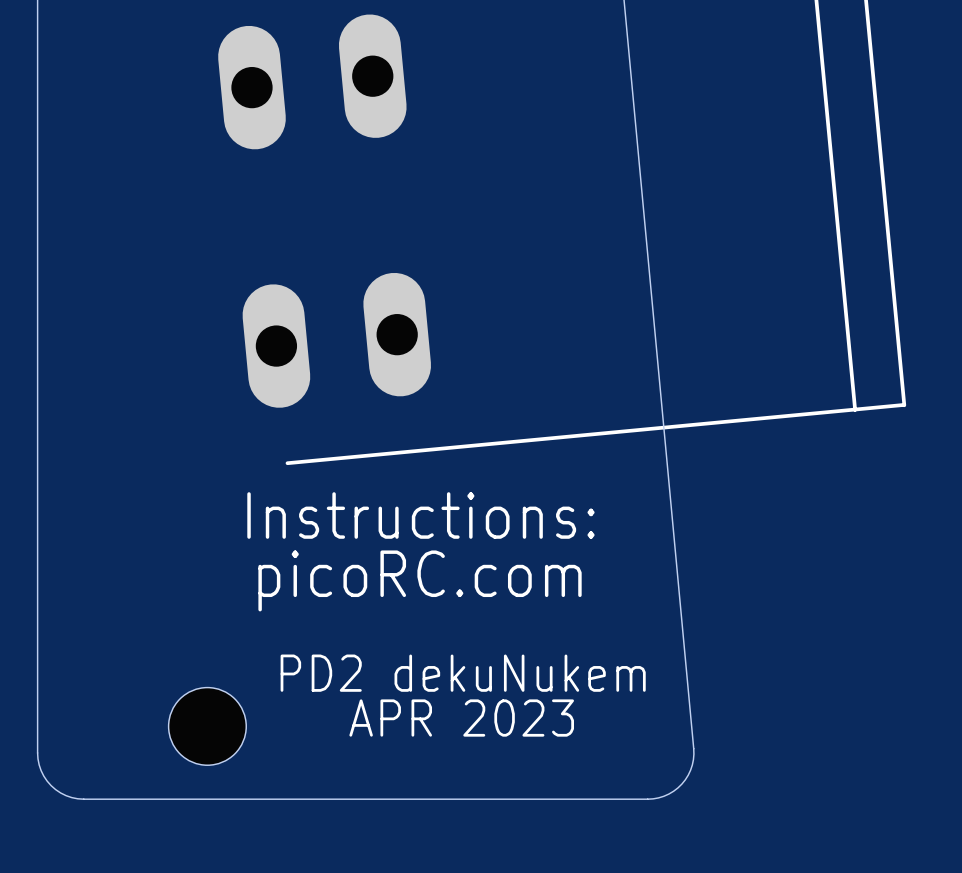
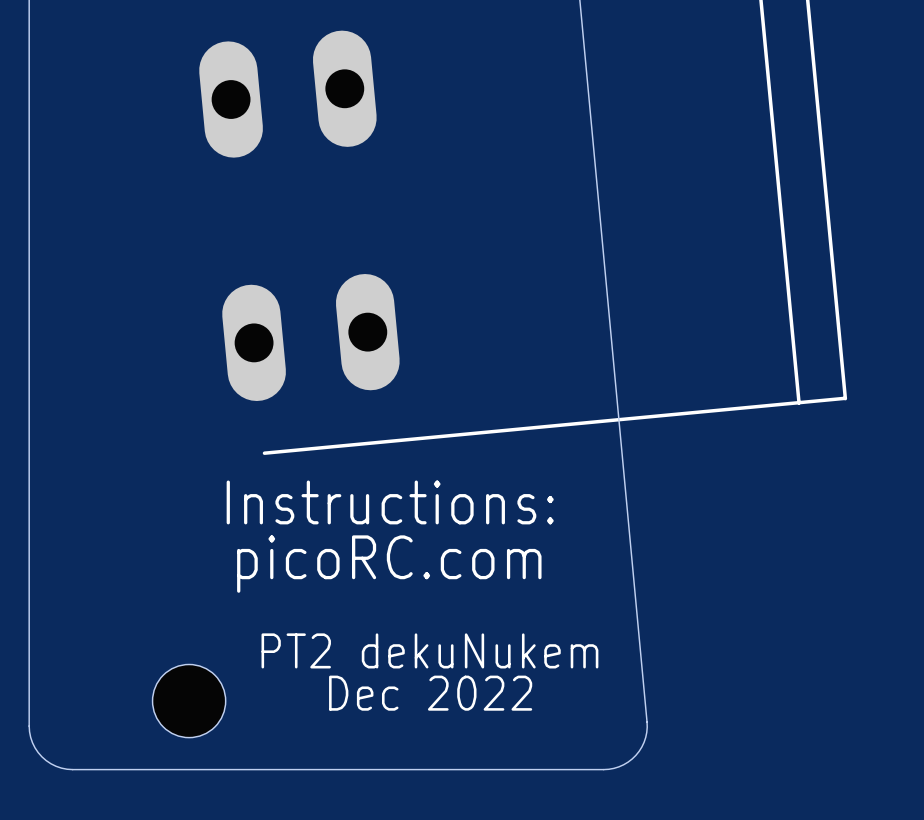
text: PD2 dekuNukem (463, 673) -> PT2 dekuNukem (429, 650)
text: APR 2023 (461, 718) -> Dec 2022 (430, 693)

